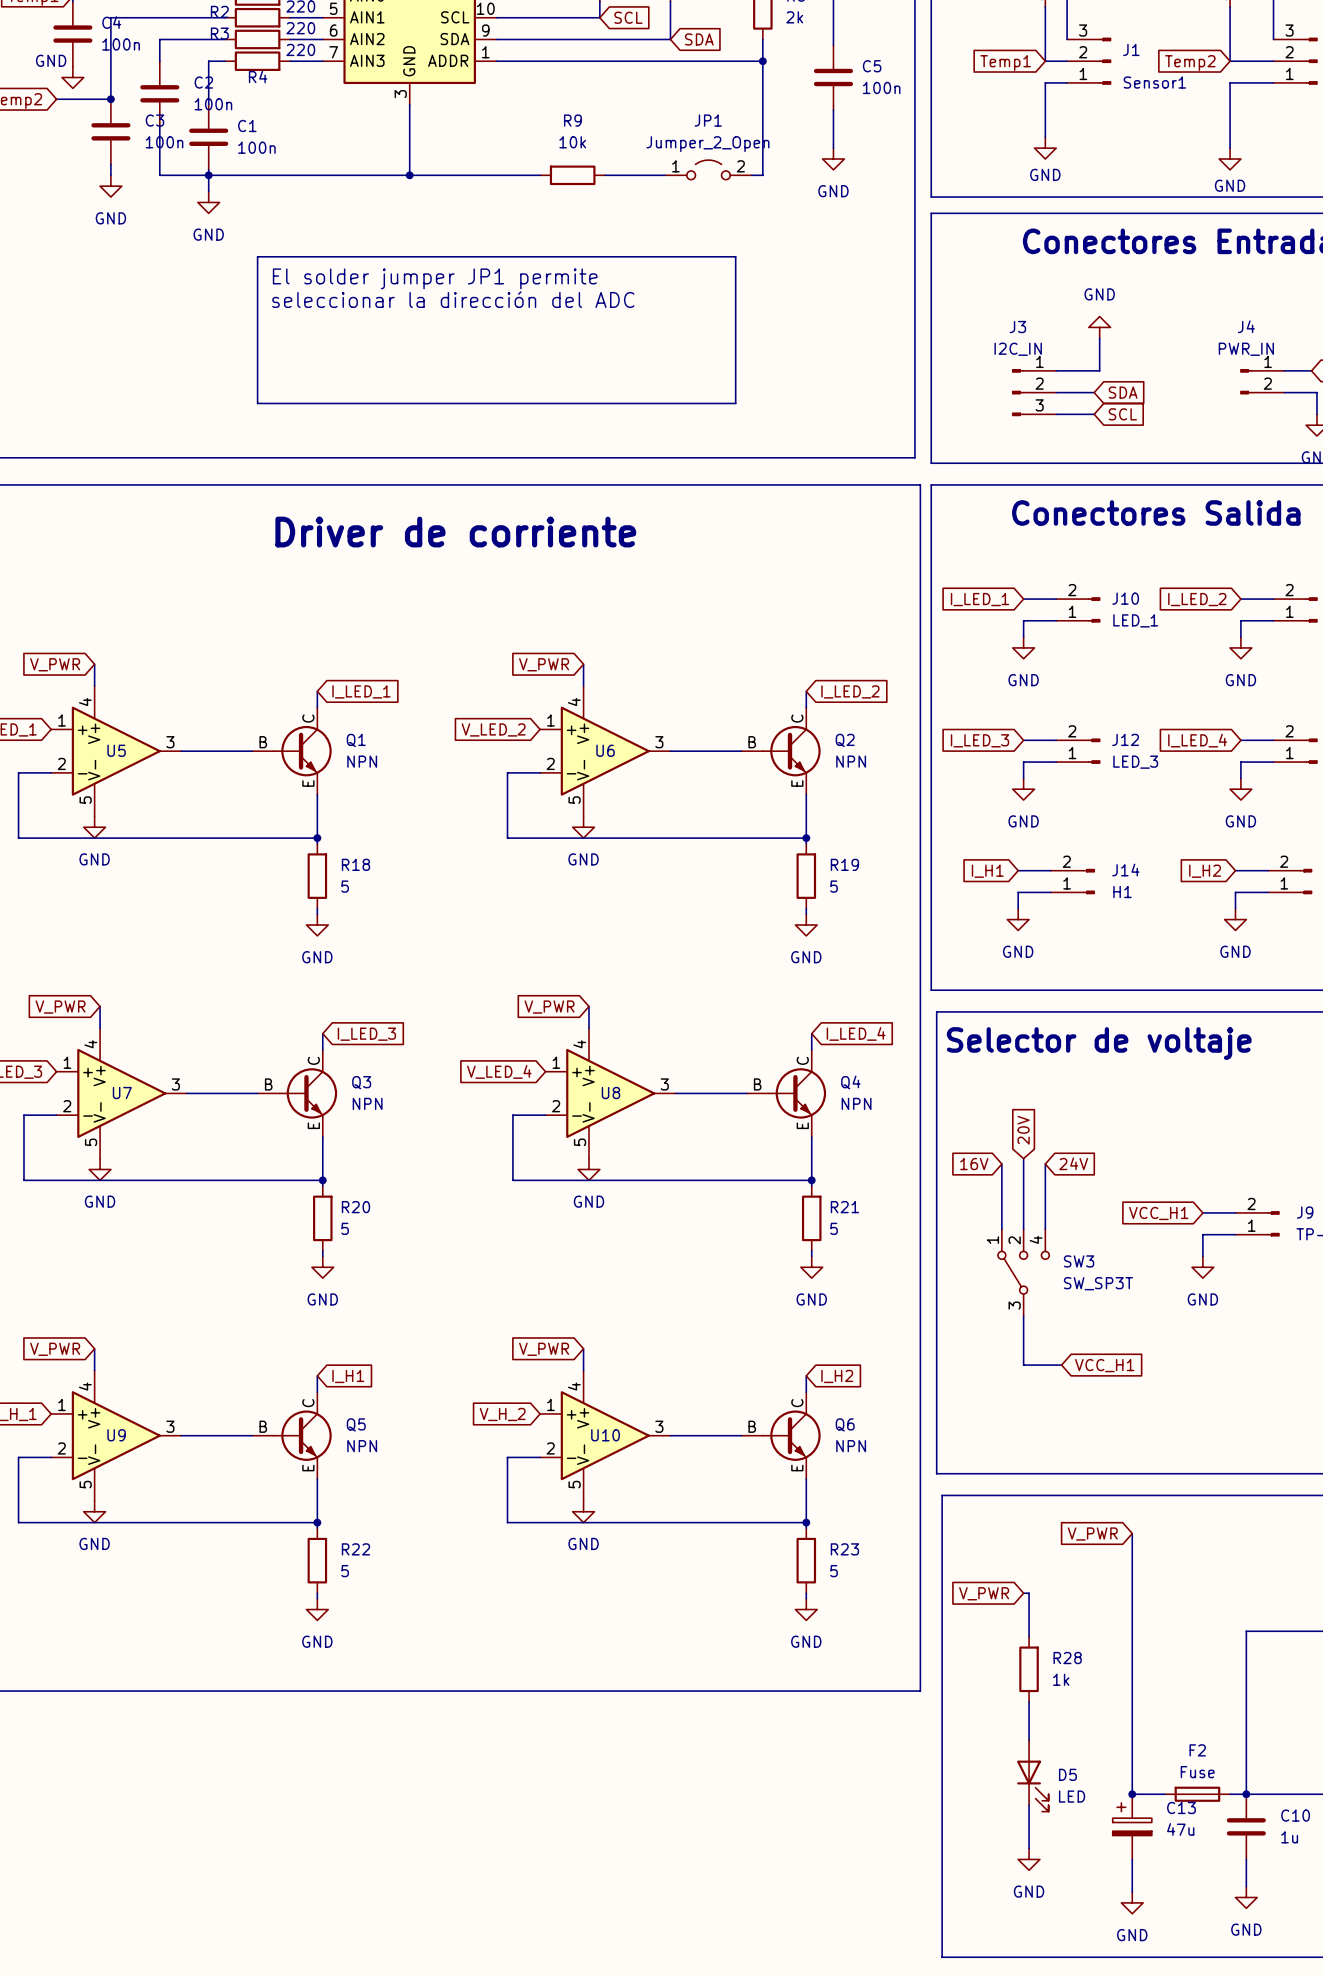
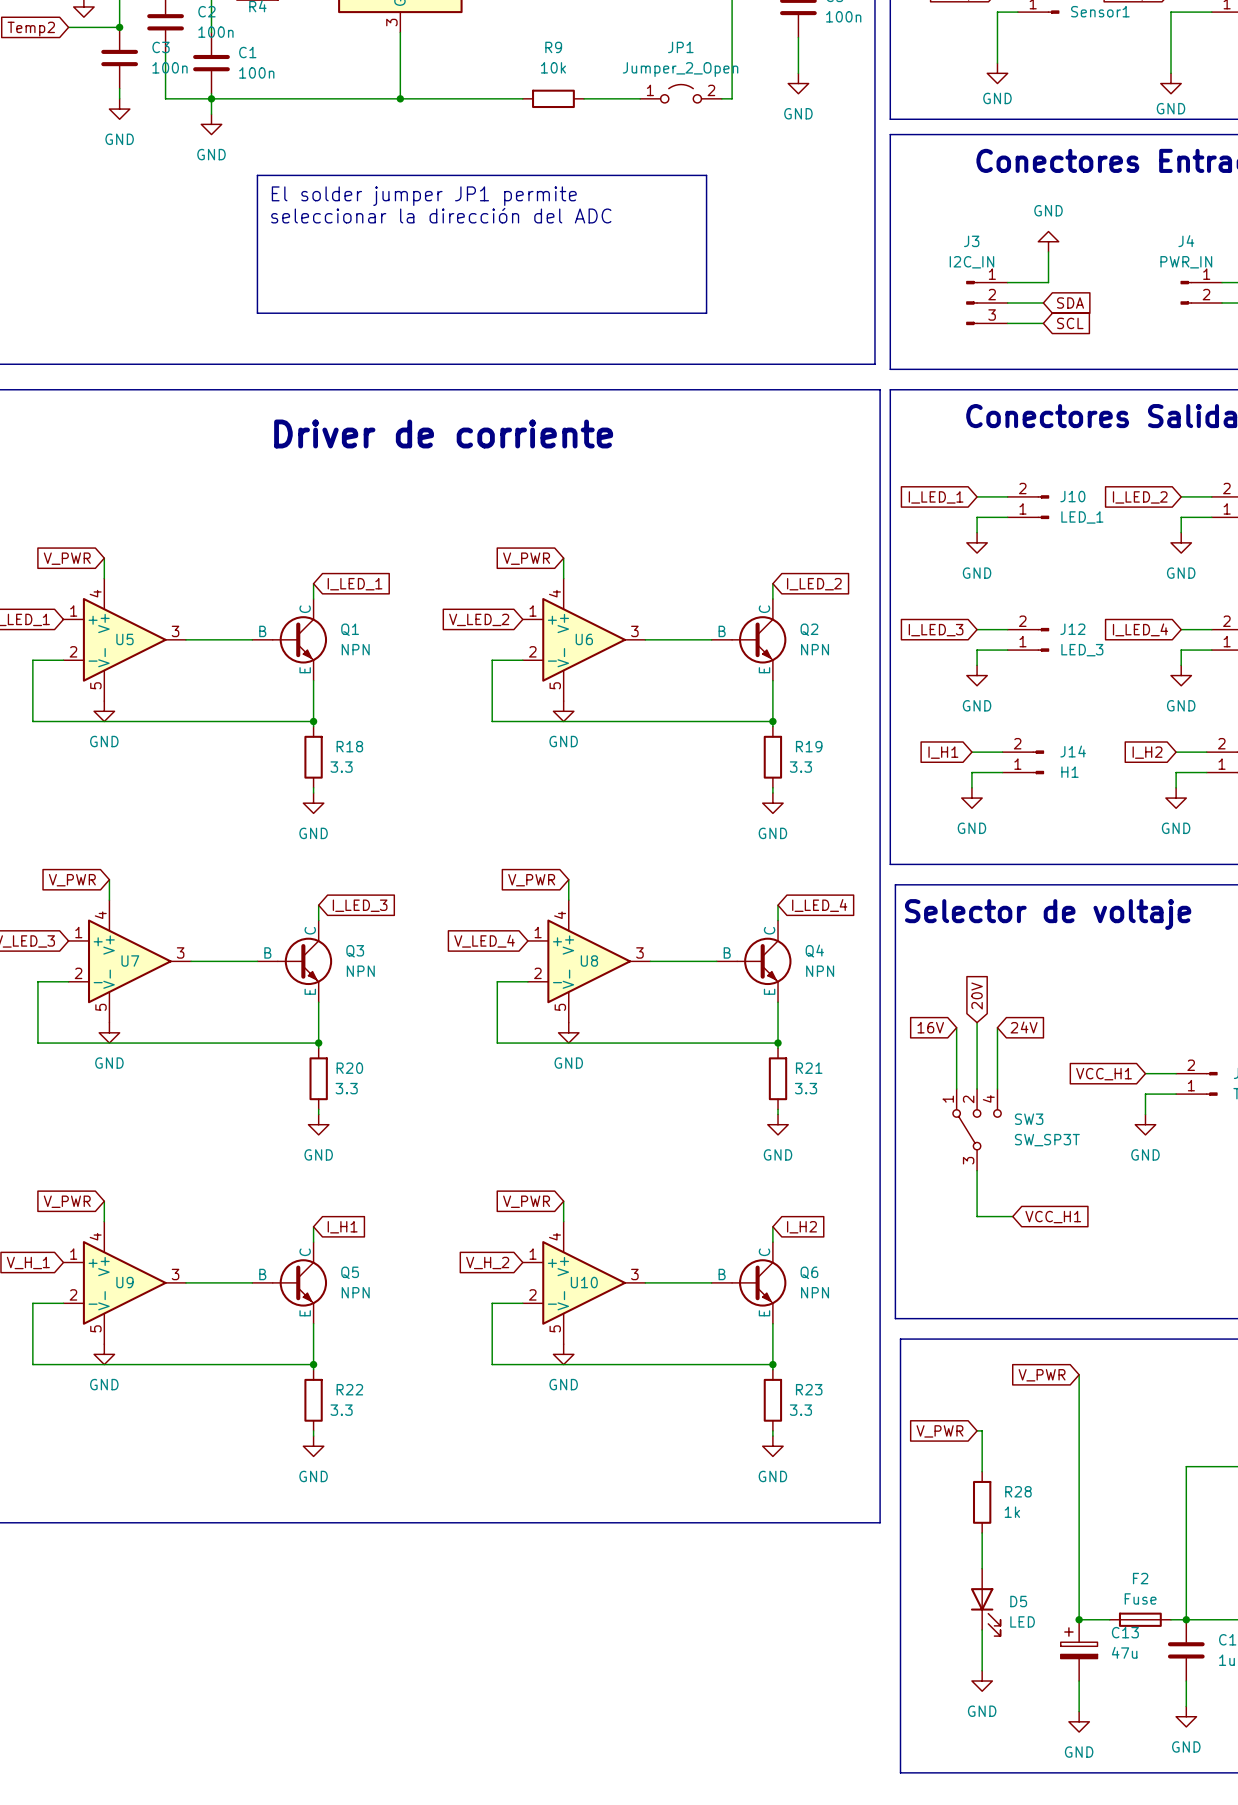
R18 value: 5 (345, 886) -> 3.3 (341, 767)
R19 value: 5 (834, 886) -> 3.3 (800, 767)
R20 value: 5 (345, 1228) -> 3.3 (346, 1088)
R21 value: 5 (834, 1228) -> 3.3 (806, 1088)
R22 value: 5 (345, 1571) -> 3.3 (341, 1410)
R23 value: 5 (834, 1571) -> 3.3 (800, 1410)

